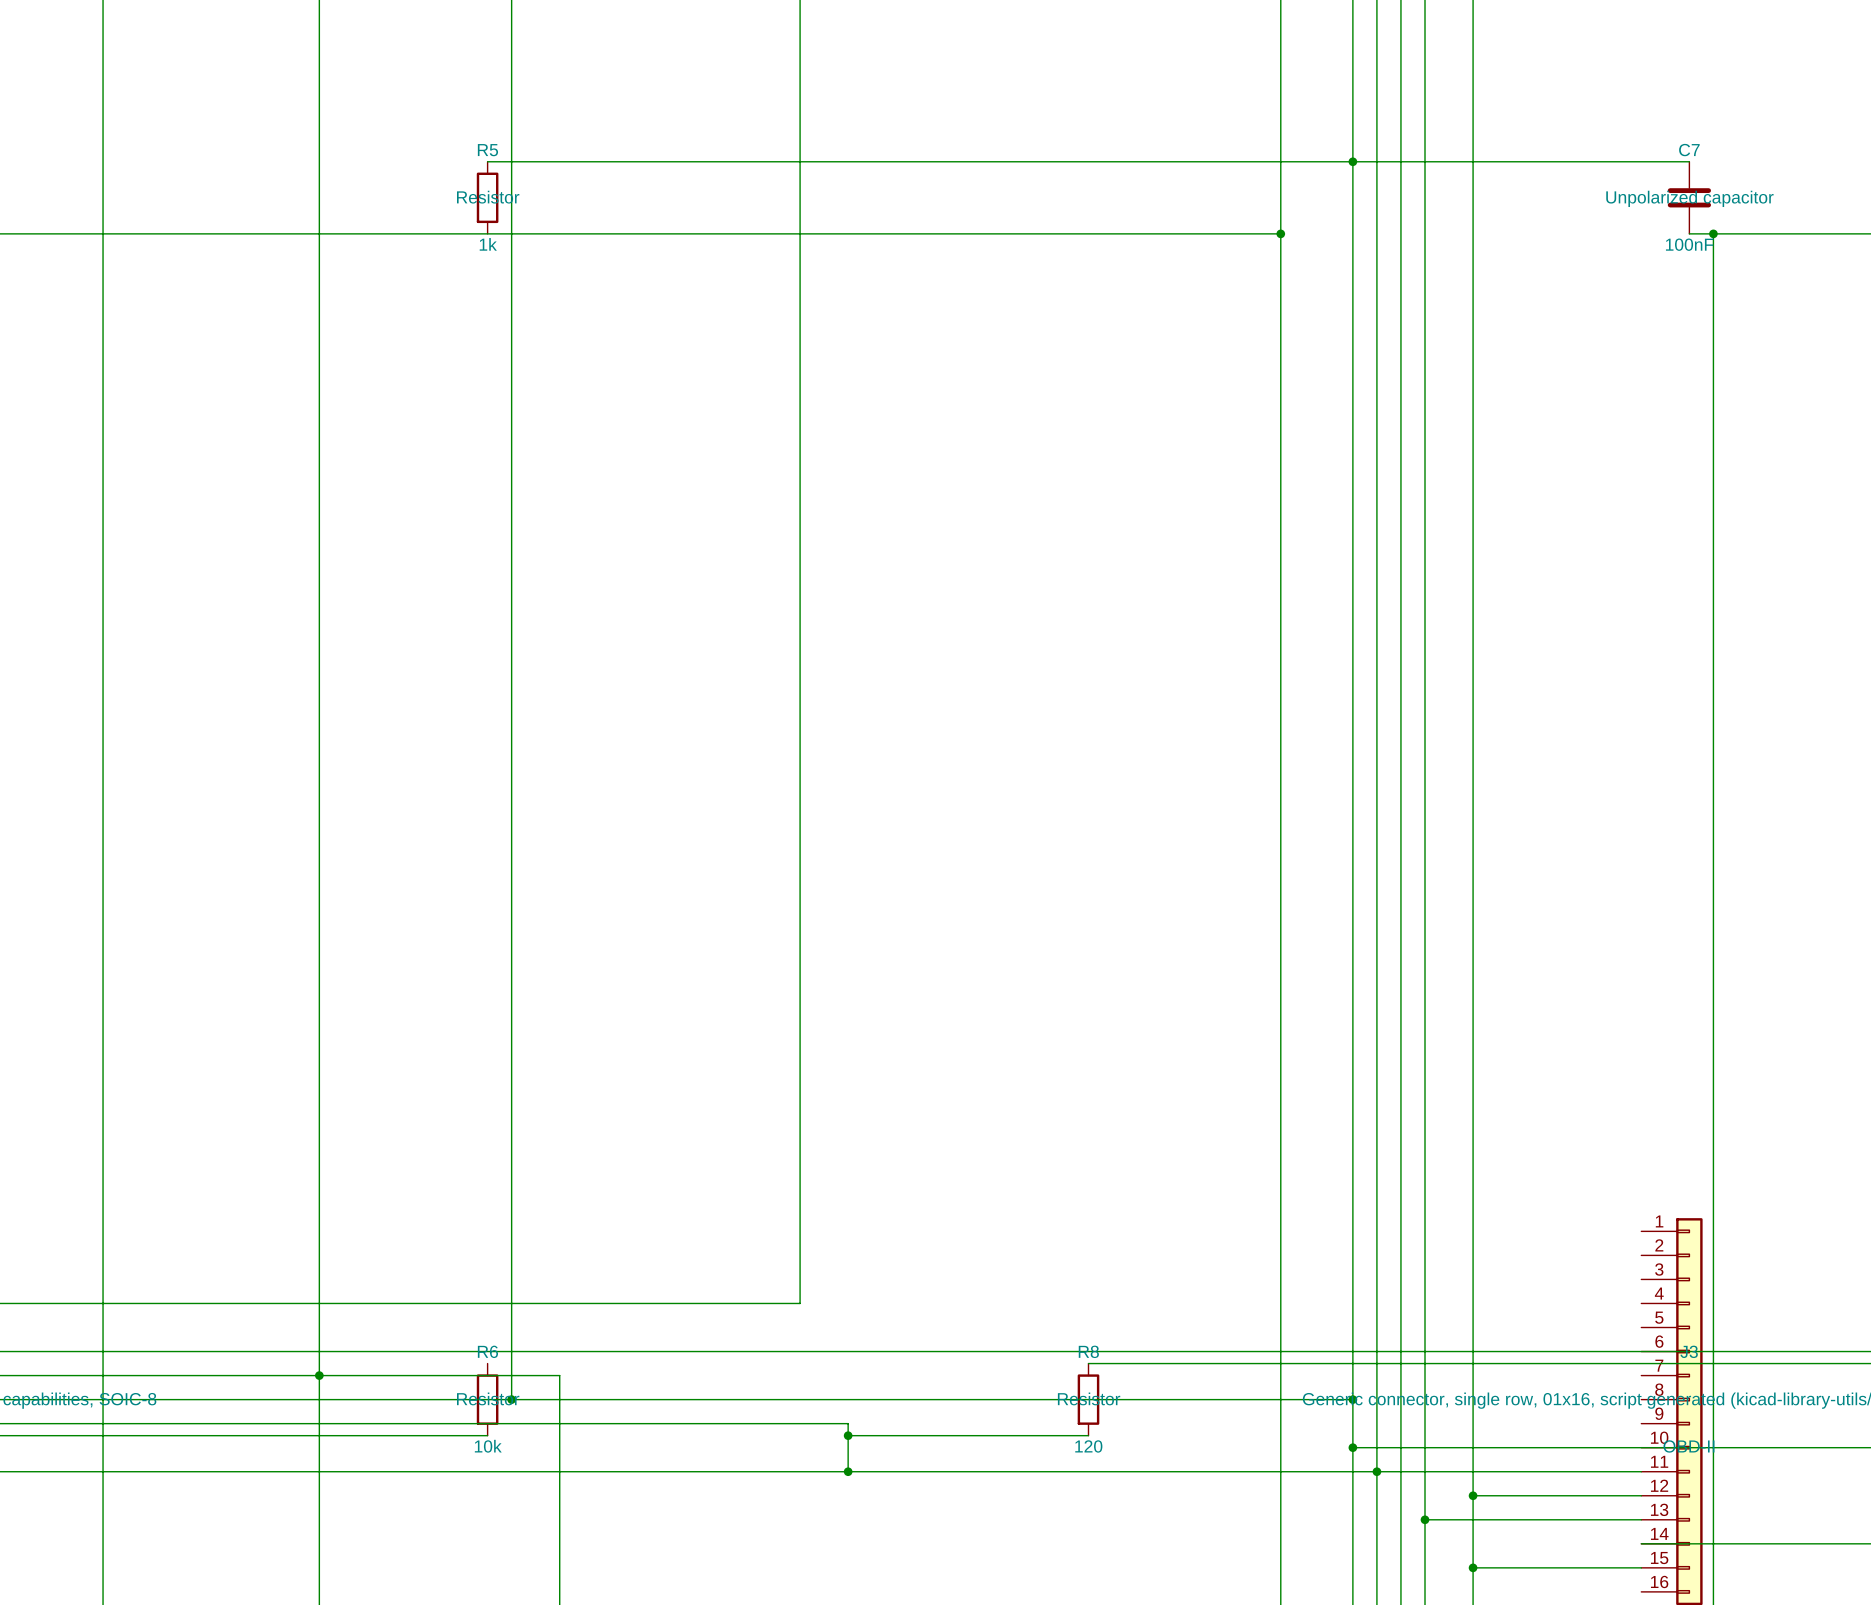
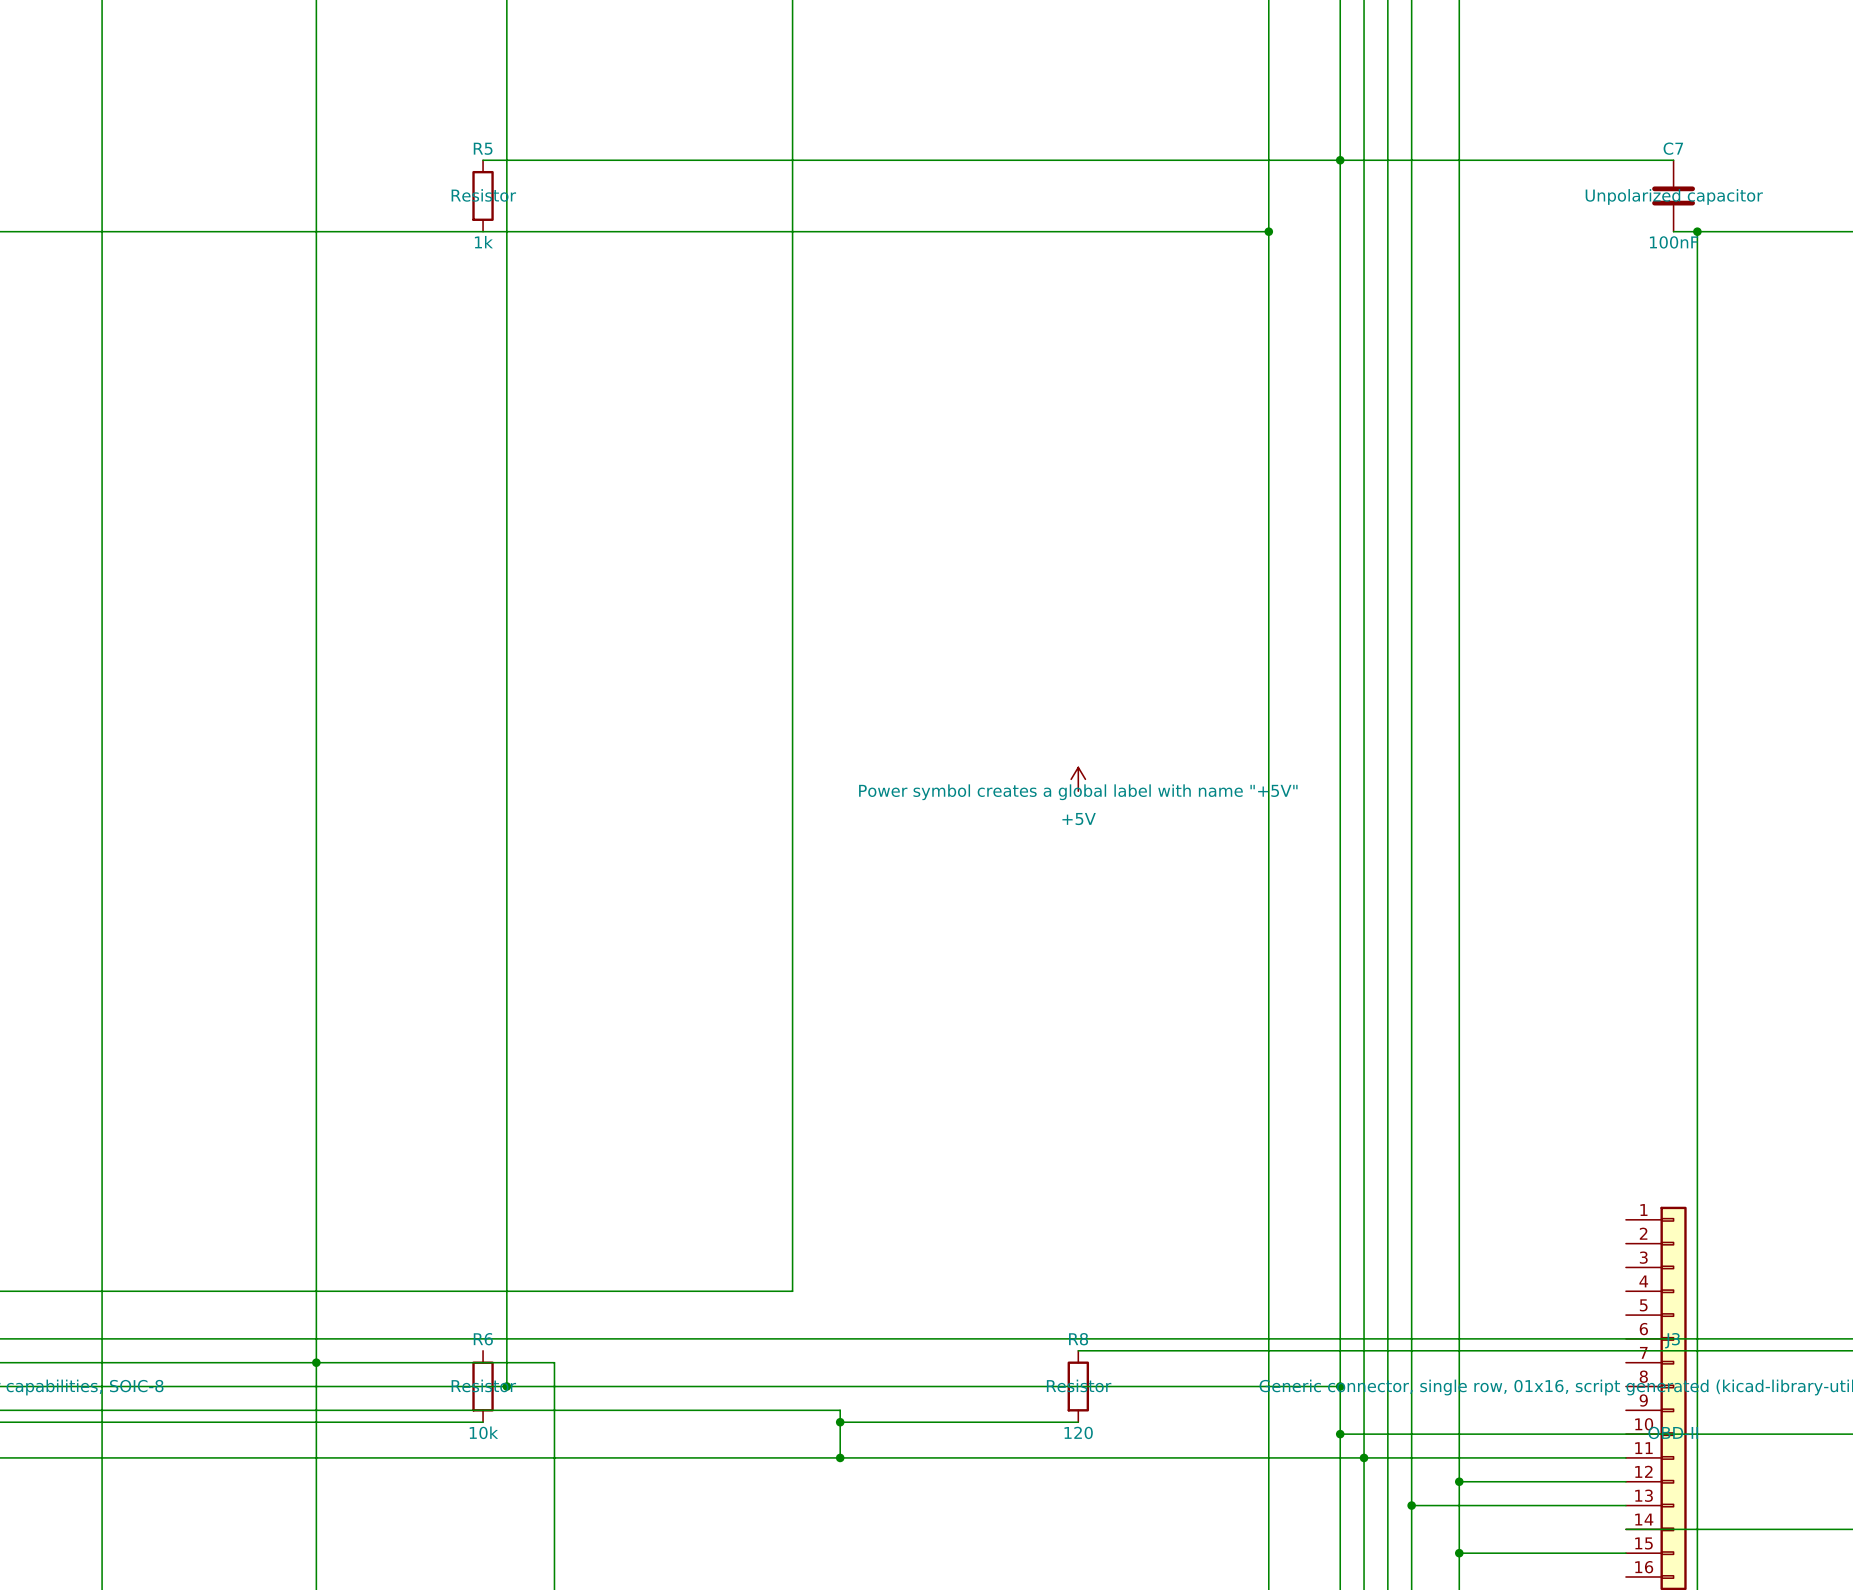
power symbol: none -> +5V (1078, 779)

